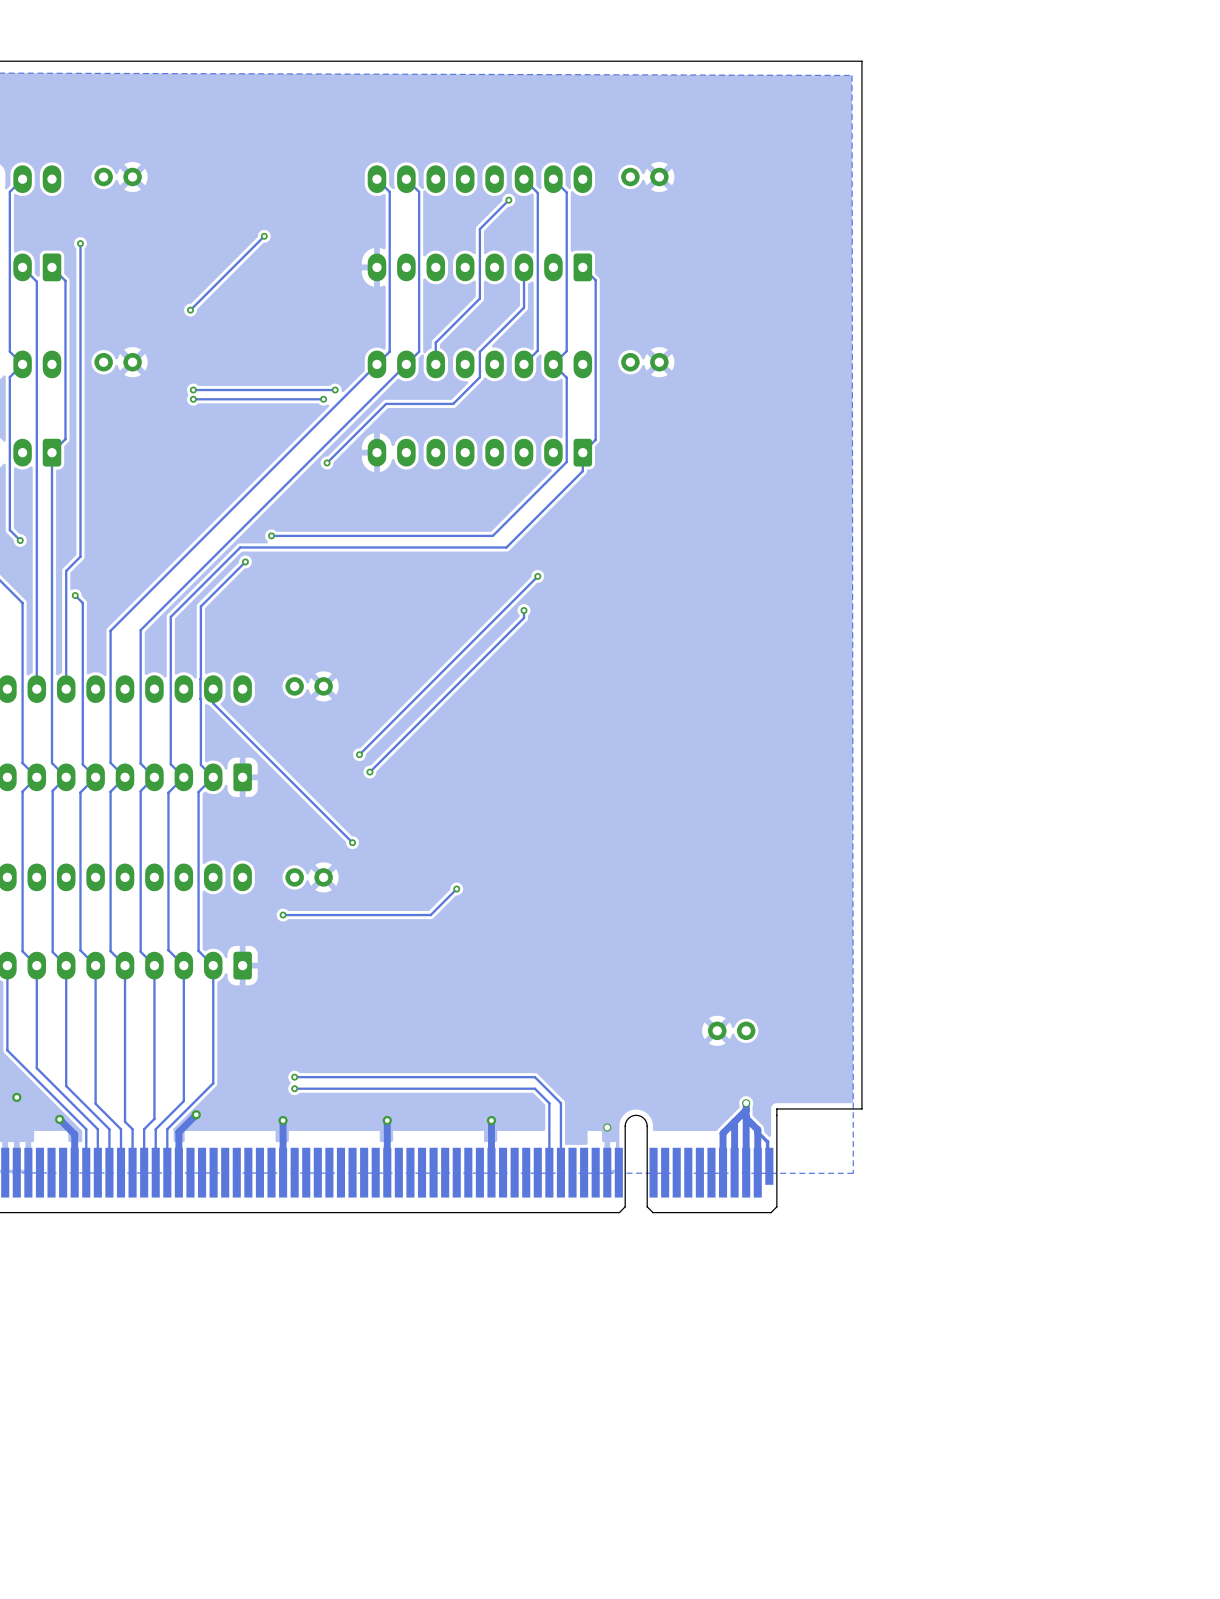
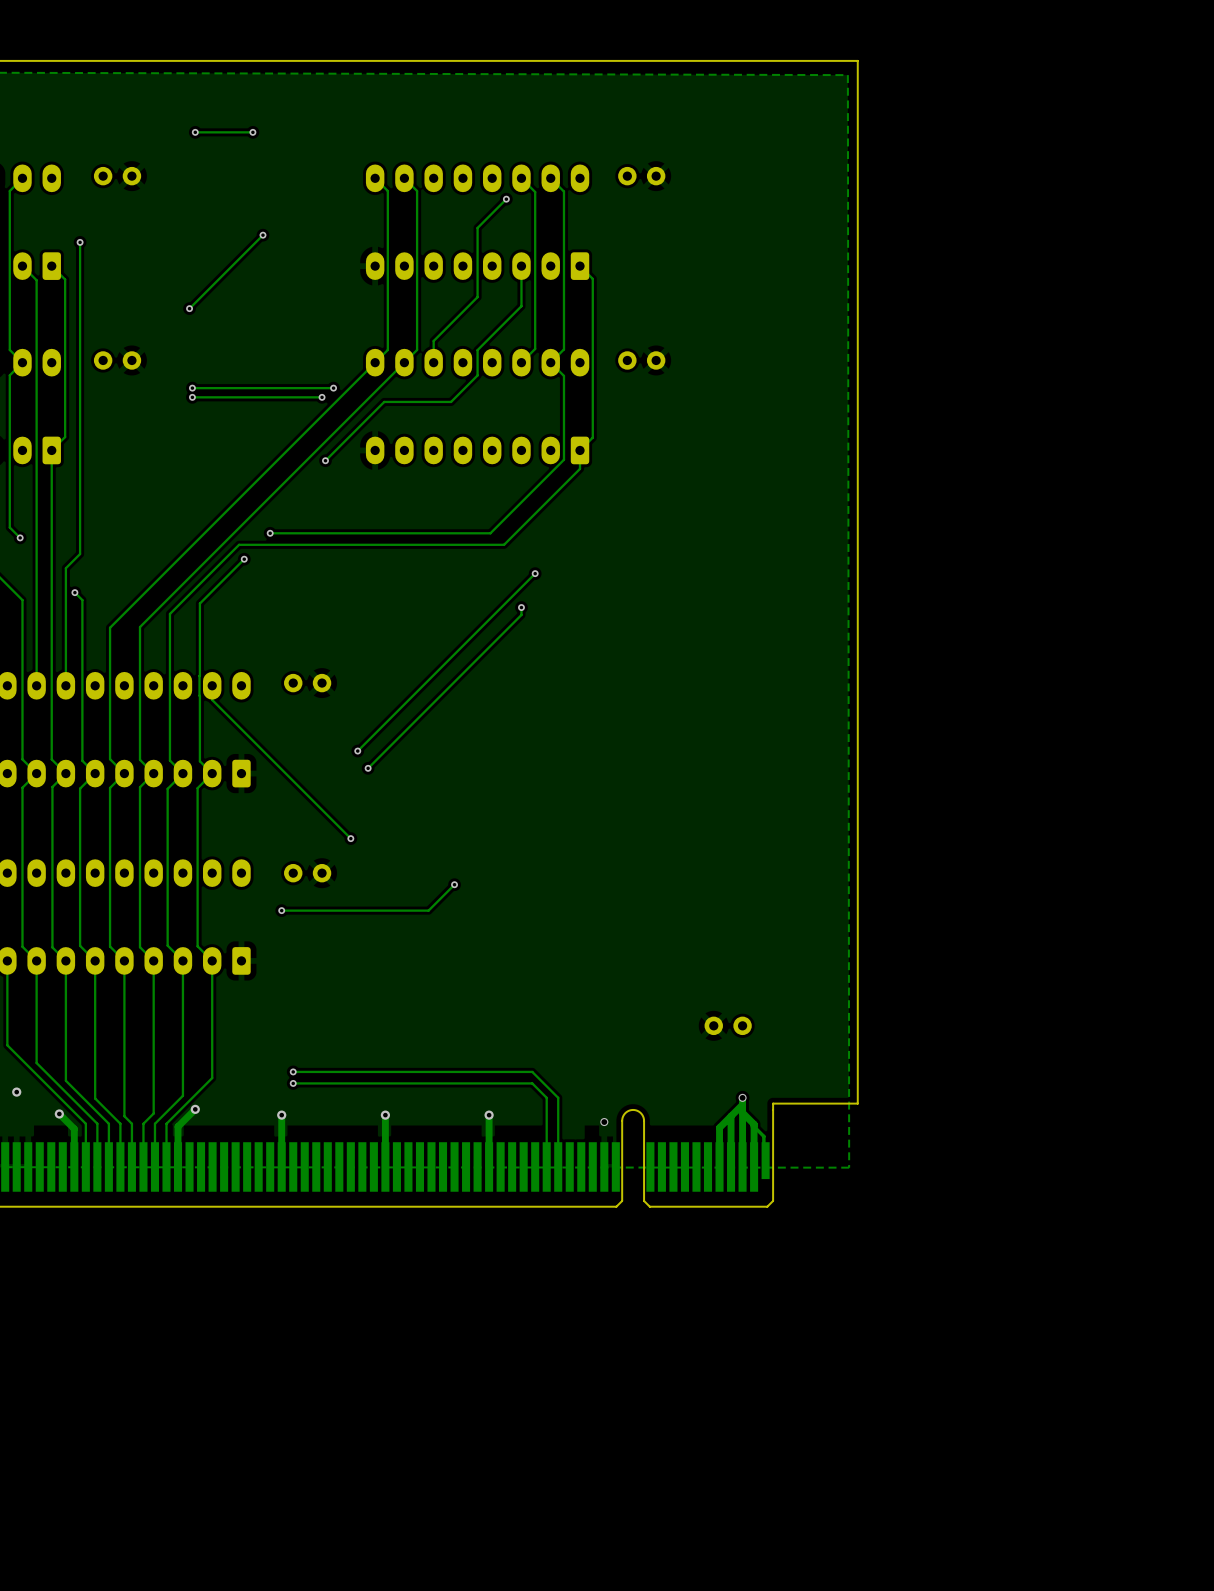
via: none -> (195, 132)
track: none -> (252, 132) (195, 132)
via: none -> (252, 132)

